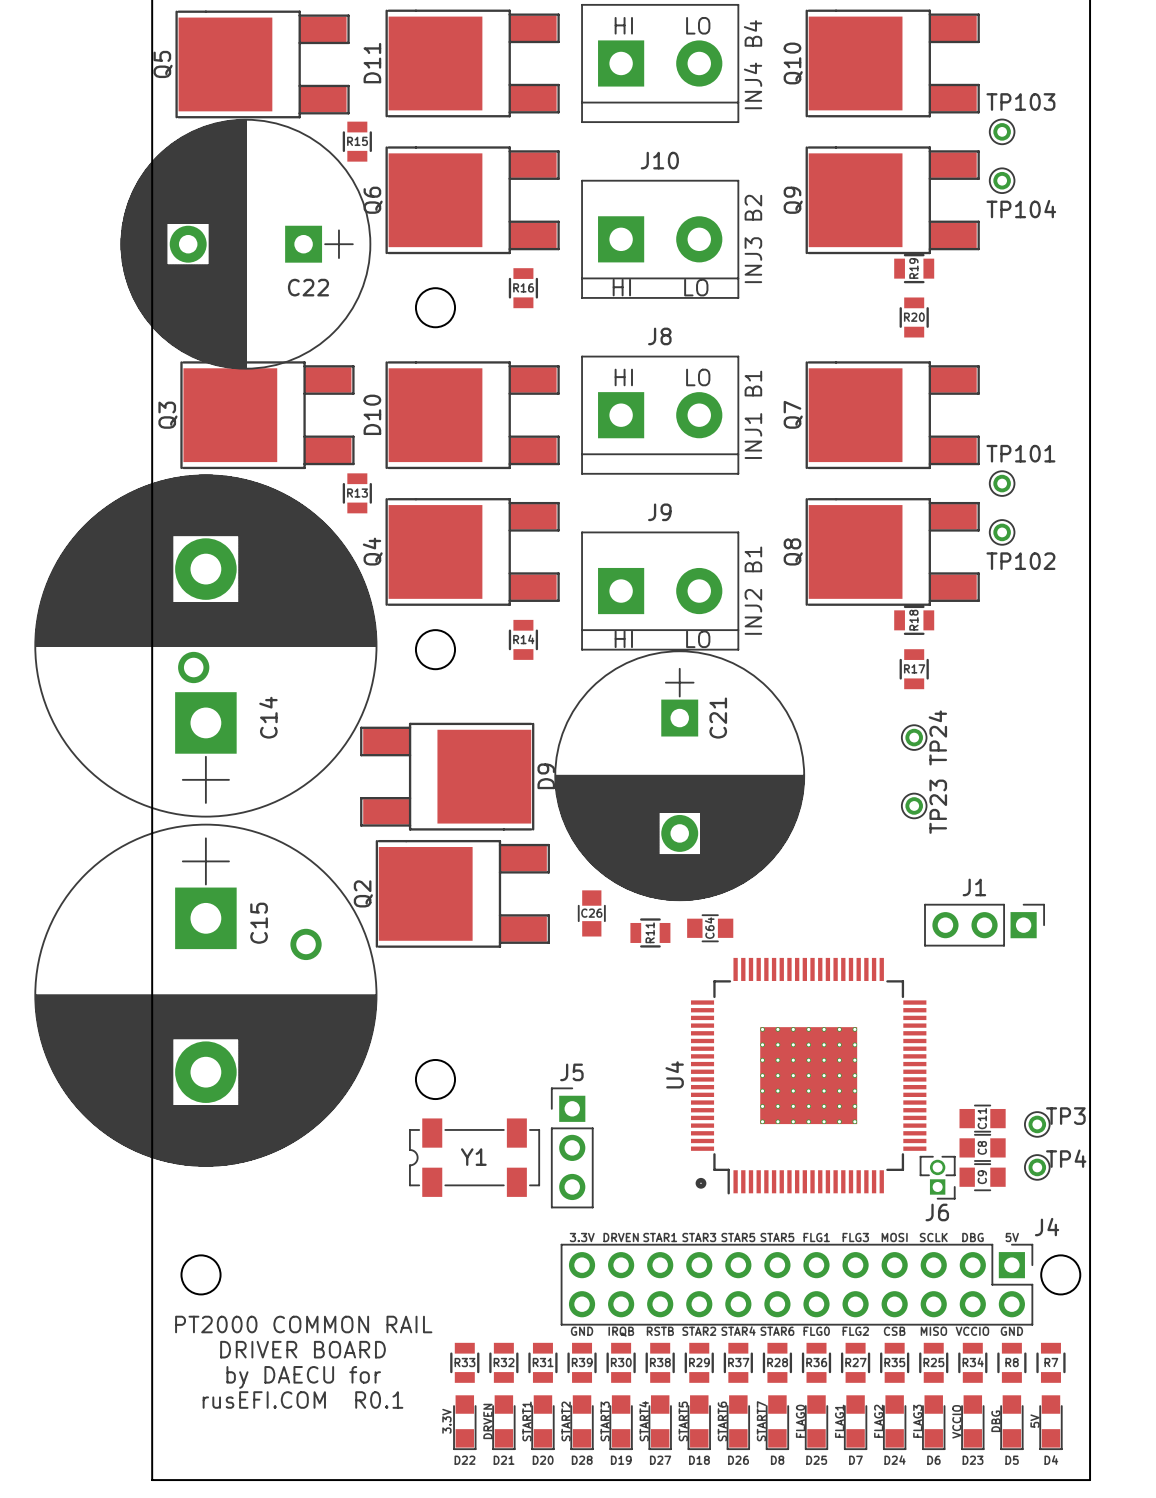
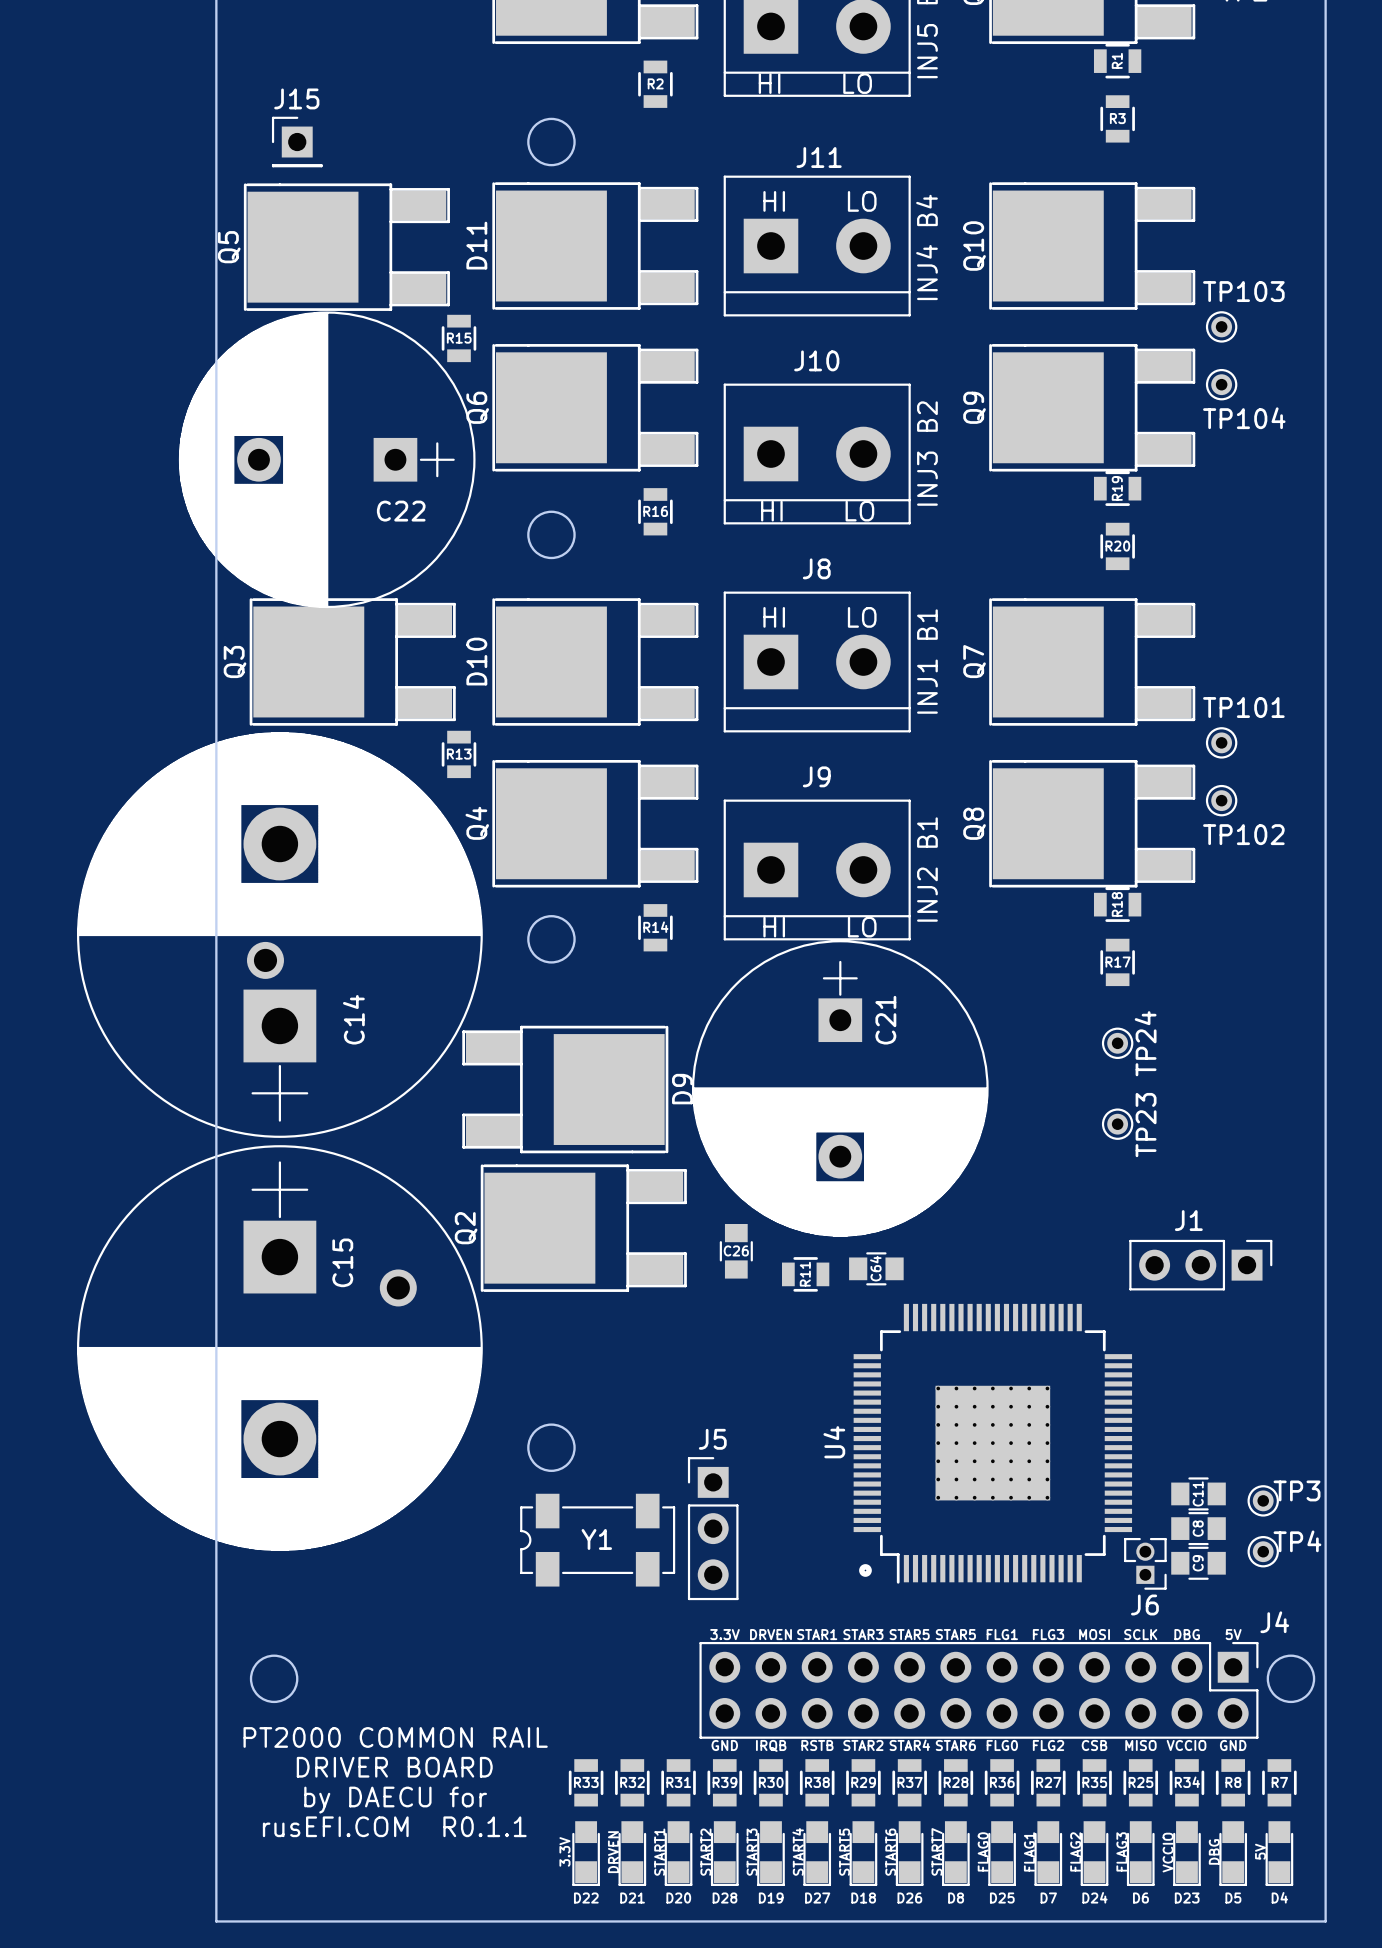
text: rusEFI.COM R0.1 (302, 1400) -> rusEFI.COM R0.1.1 (394, 1826)

